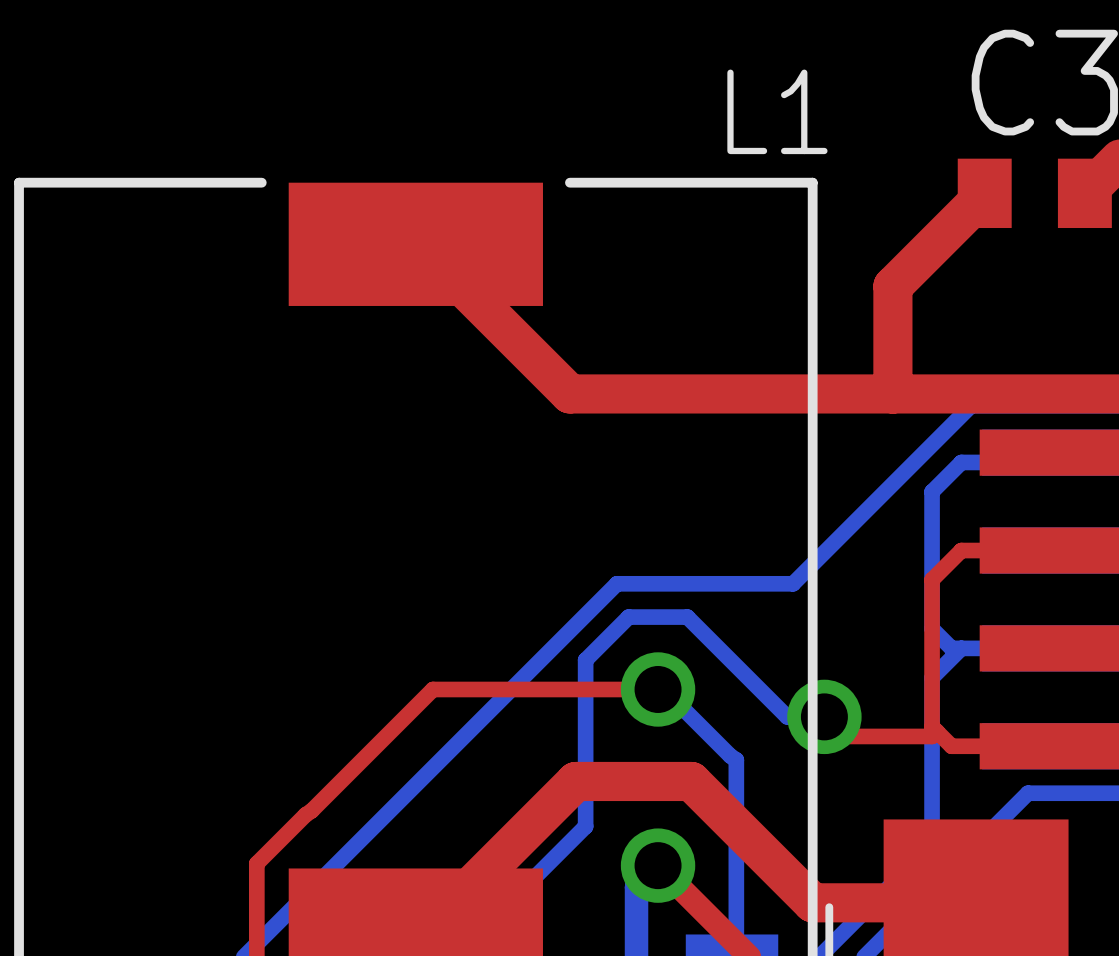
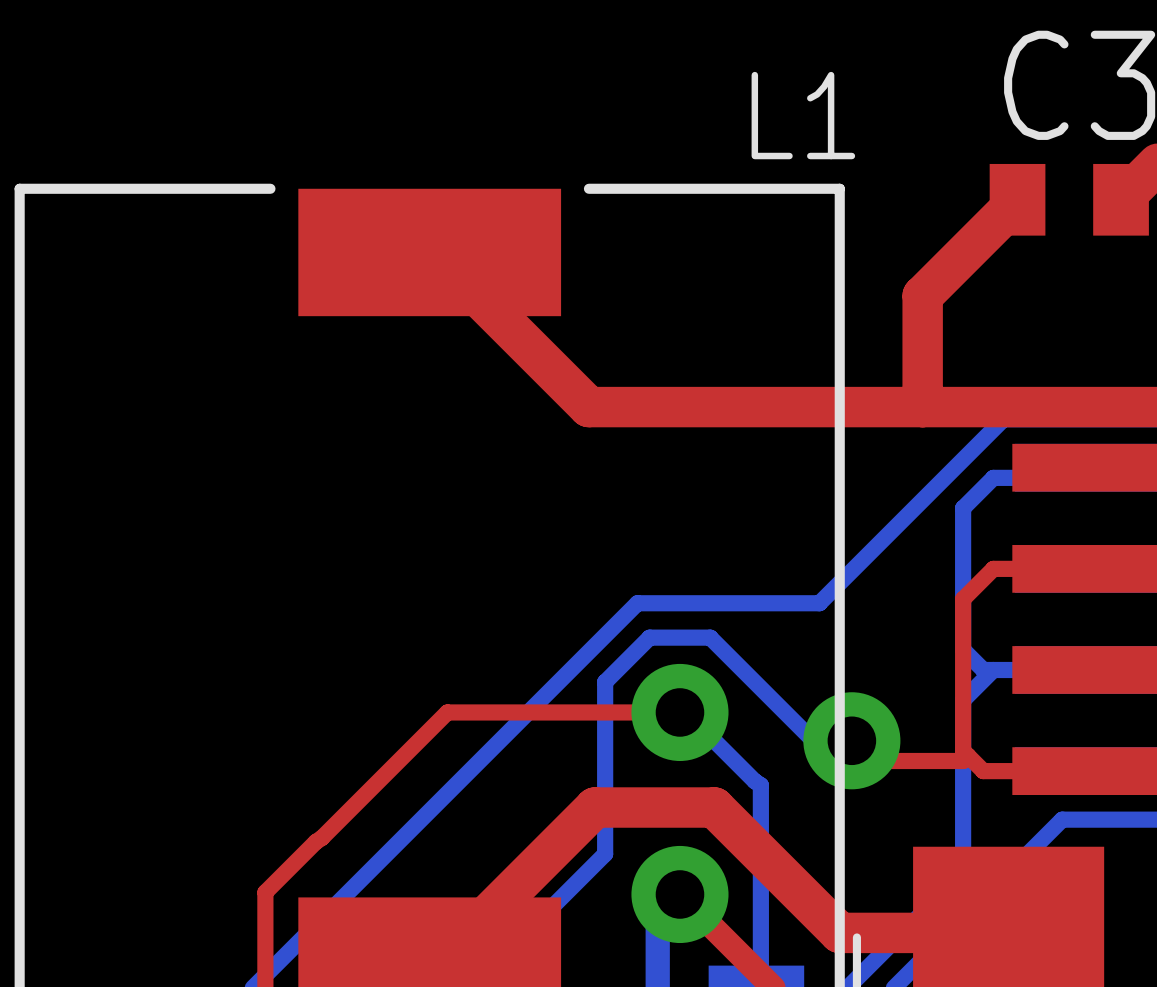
via size: [620, 652, 696, 727] -> [631, 663, 729, 762]
via size: [787, 679, 862, 755] -> [803, 692, 901, 790]
via size: [620, 828, 696, 903] -> [631, 845, 729, 944]

